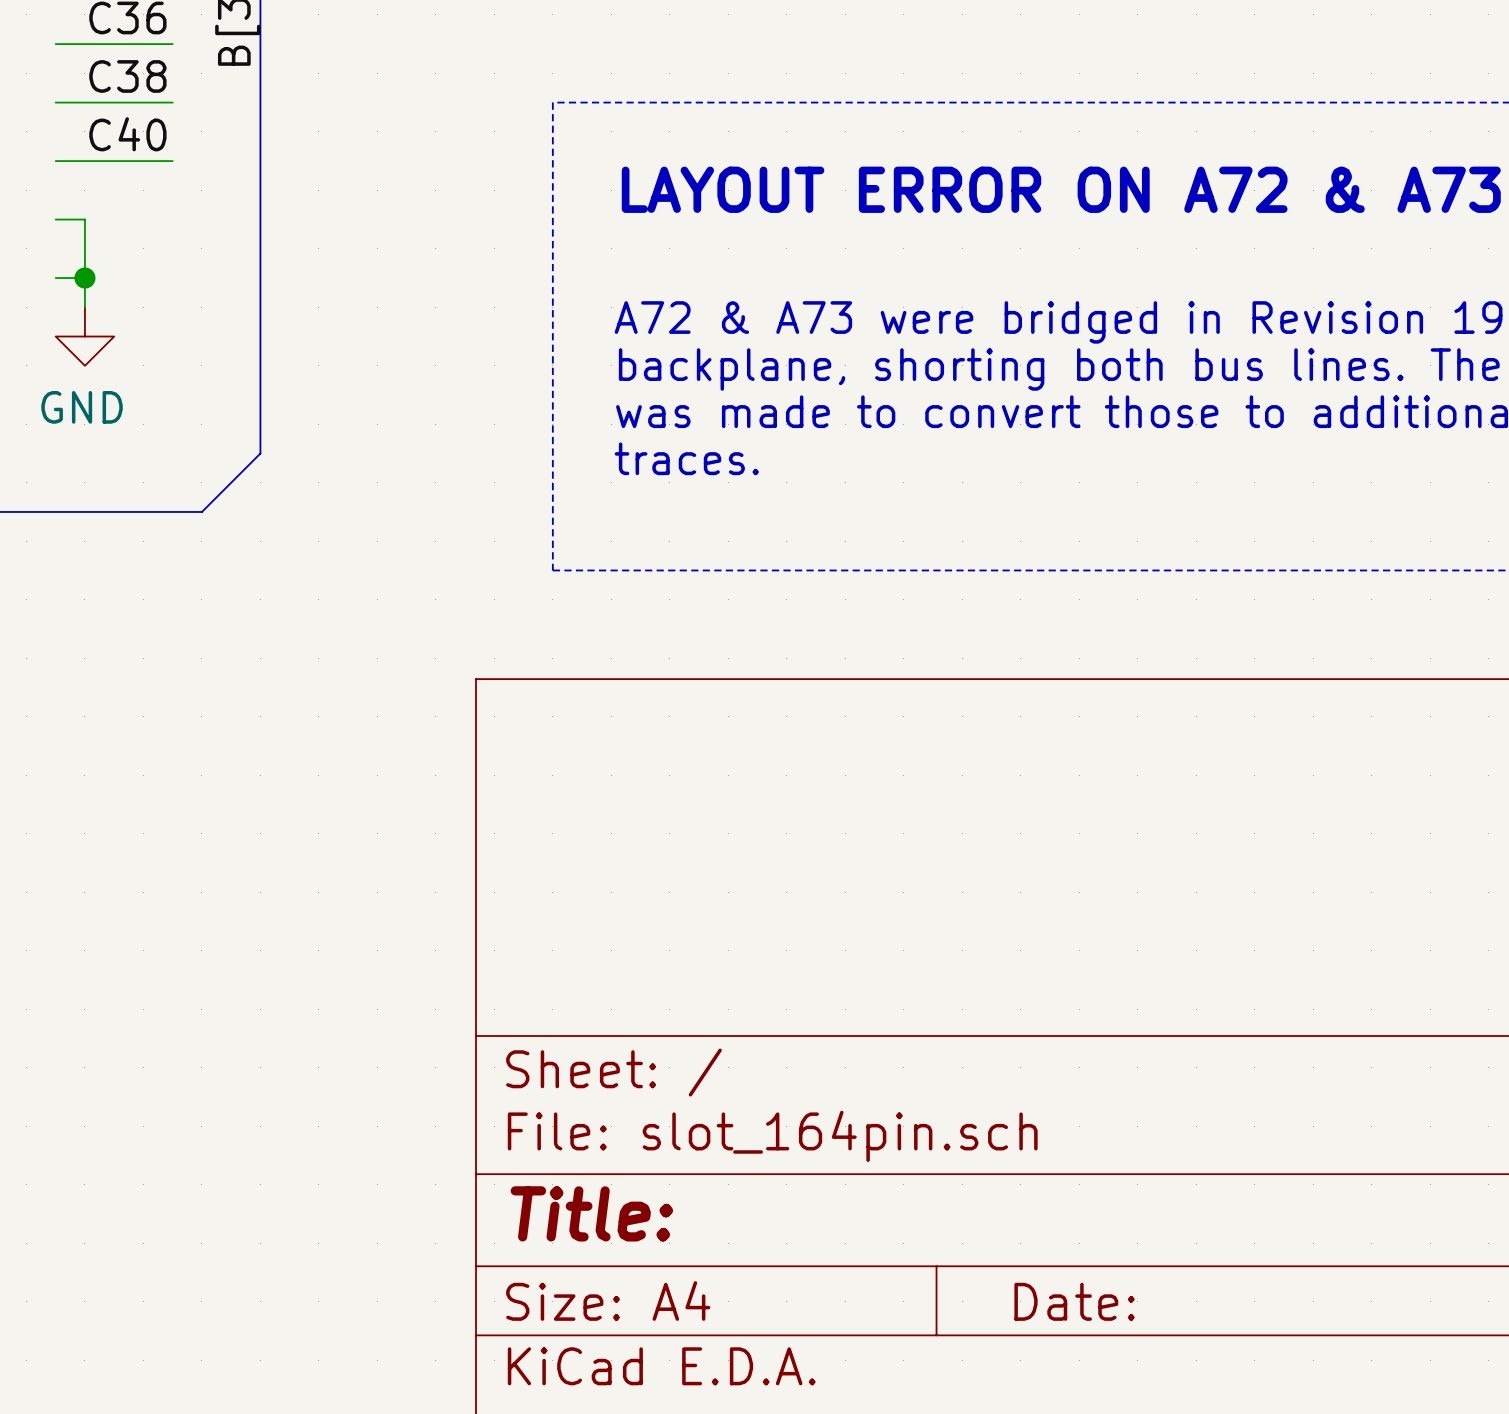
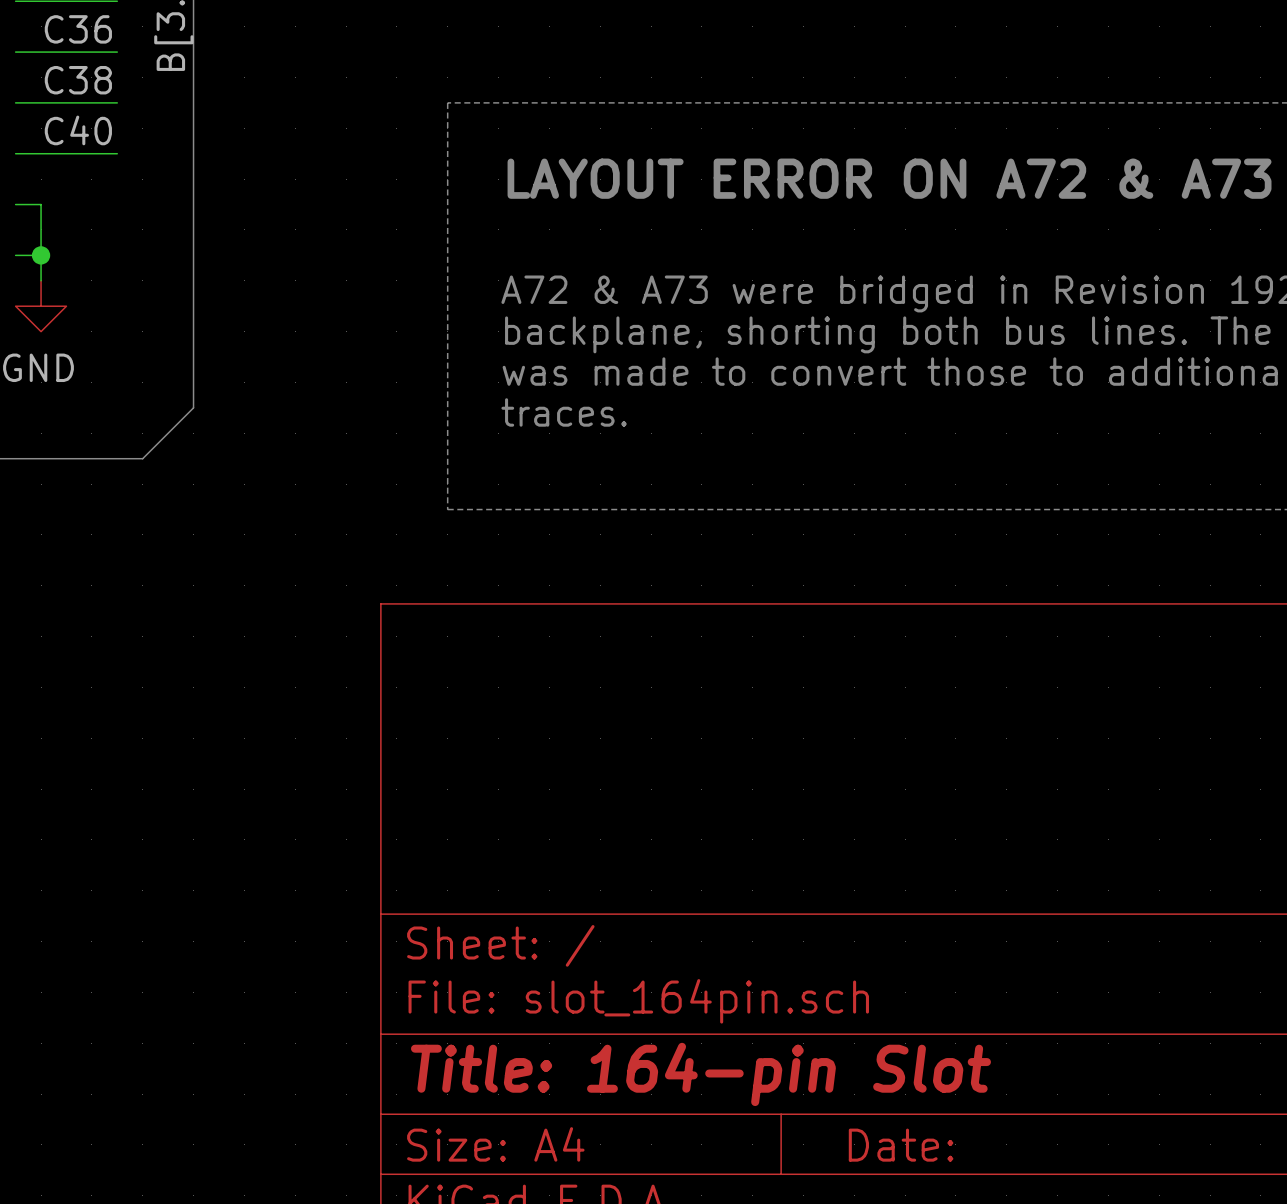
title block: Title: (591, 1213) -> Title: 164-pin Slot (700, 1074)

